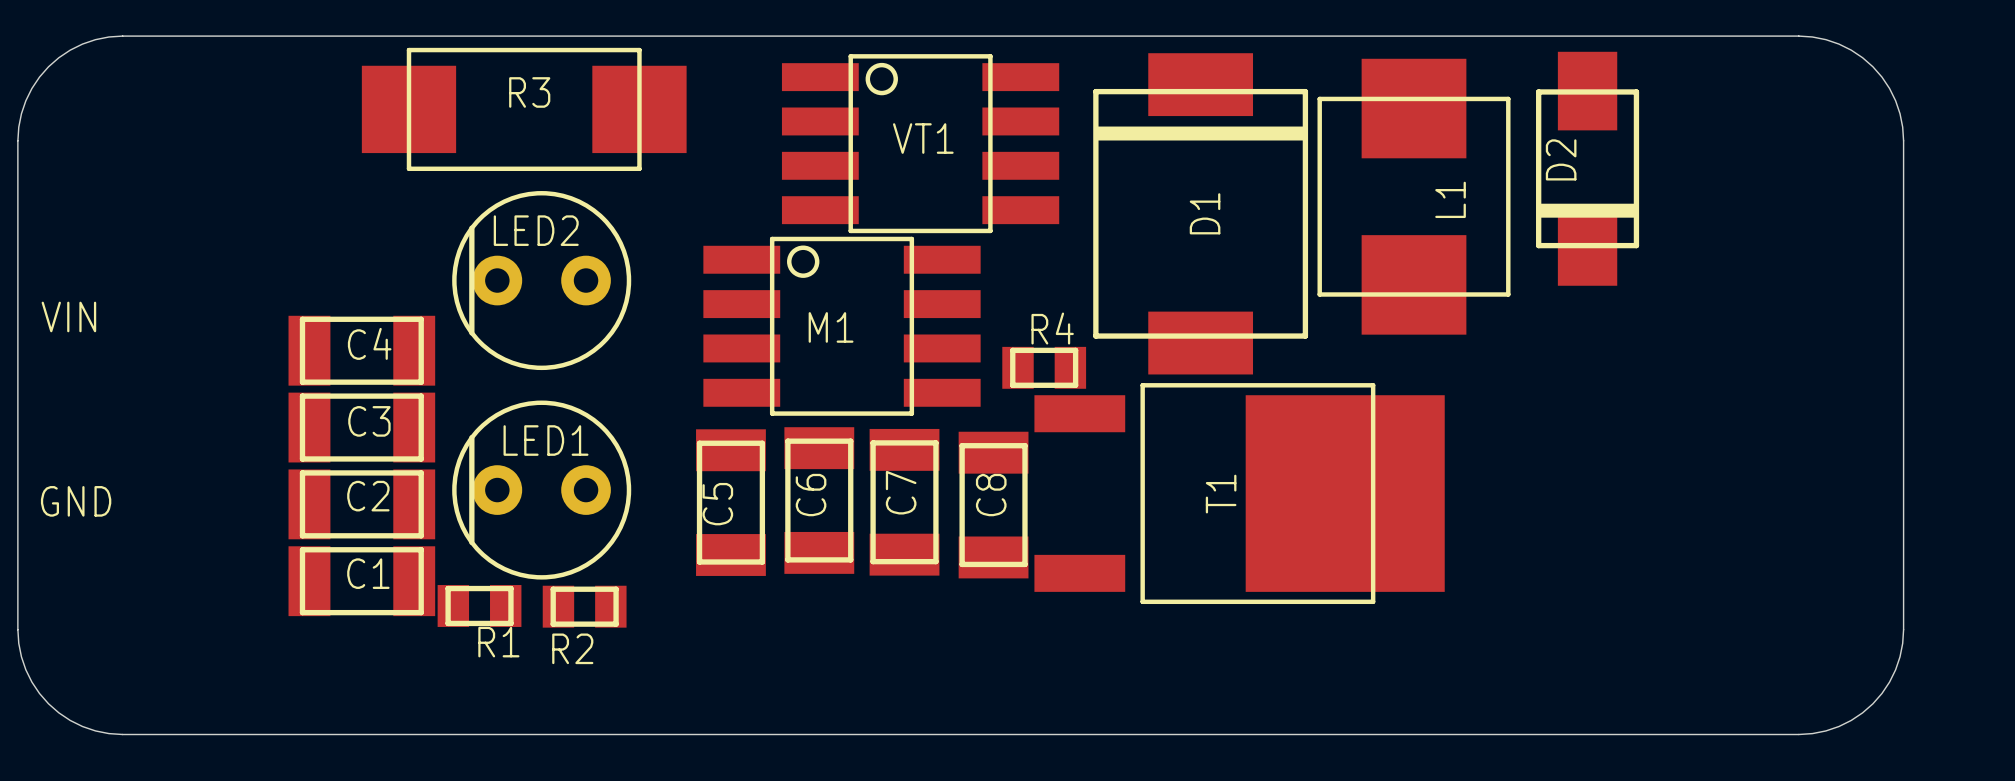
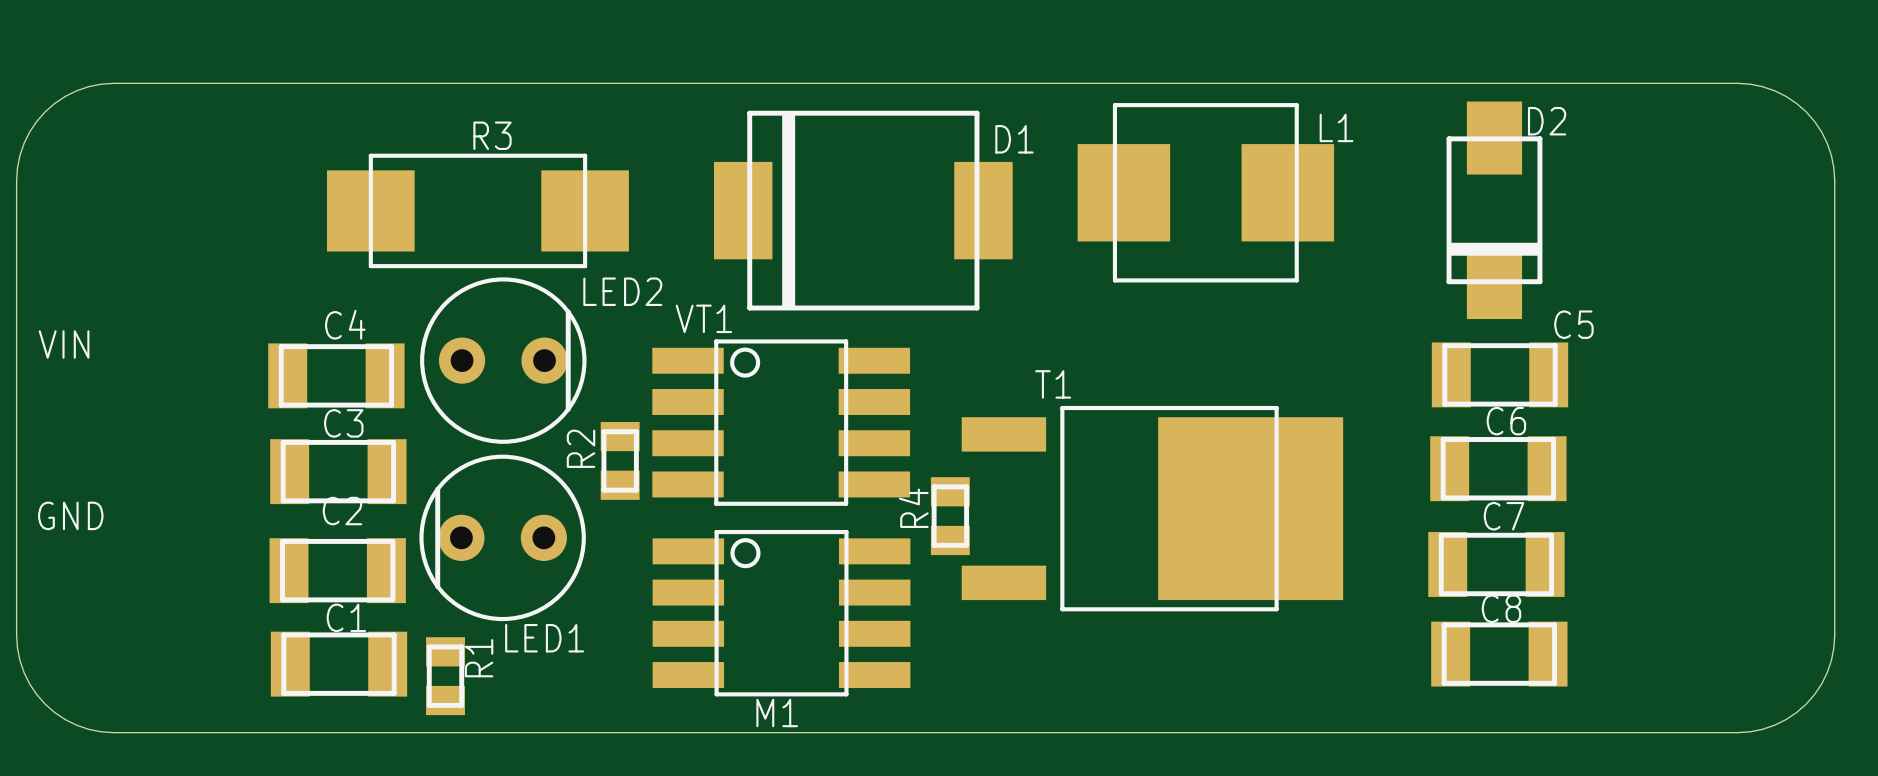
board edge: (1798, 36) (1825, 39) (1838, 44) (1862, 57) (1872, 66) (1881, 77) (1895, 100) (1900, 113) (1903, 140) (1902, 643) (1900, 656) (1889, 682) (1881, 693) (1862, 712) (1851, 720) (1825, 730) (1798, 734) -> (1672, 83) (1750, 84) (1762, 86) (1786, 96) (1806, 111) (1821, 132) (1831, 155) (1834, 180) (1834, 635) (1831, 660) (1821, 683) (1814, 694) (1796, 712) (1774, 725) (1750, 731) (1672, 732)
R3 position: (524, 109) -> (477, 210)
VT1 name position: VT1 (923, 138) -> VT1 (703, 318)
VT1 position: (920, 143) -> (781, 422)
D2 name rotation: 0° (1561, 159) -> 90° clockwise (1547, 121)
D2 name position: D2 (1561, 159) -> D2 (1547, 121)
D2 position: (1587, 168) -> (1494, 210)
L1 rotation: 0° (1414, 196) -> 90° clockwise (1205, 192)
L1 name position: L1 (1450, 199) -> L1 (1336, 127)
D1 rotation: 0° (1200, 213) -> 90° counterclockwise (863, 210)
D1 position: (1200, 213) -> (863, 210)
D1 name position: D1 (1205, 213) -> D1 (1014, 139)
LED2 name position: LED2 (536, 230) -> LED2 (622, 291)
LED2 rotation: 0° (541, 280) -> 180° (503, 360)
M1 position: (842, 326) -> (781, 613)
M1 name position: M1 (831, 327) -> M1 (777, 712)
C4 name position: C4 (369, 343) -> C4 (345, 324)
R4 rotation: 0° (1044, 367) -> 90° clockwise (950, 516)
R4 position: (1044, 367) -> (950, 516)
C3 name position: C3 (369, 421) -> C3 (343, 423)
C3 position: (361, 427) -> (338, 471)
LED1 name position: LED1 (546, 440) -> LED1 (544, 638)
LED1 position: (541, 490) -> (502, 537)
T1 name rotation: 0° (1221, 494) -> 90° clockwise (1053, 384)
T1 name position: T1 (1221, 494) -> T1 (1053, 384)
C6 rotation: 0° (819, 500) -> 90° clockwise (1498, 468)
C6 position: (819, 500) -> (1498, 468)
C5 rotation: 0° (730, 502) -> 90° clockwise (1499, 374)
C5 position: (730, 502) -> (1499, 374)
C7 rotation: 0° (904, 502) -> 90° clockwise (1496, 564)
C7 position: (904, 502) -> (1496, 564)
C2 position: (361, 504) -> (337, 570)
C5 name position: C5 (717, 504) -> C5 (1573, 324)
C8 rotation: 0° (993, 505) -> 90° clockwise (1499, 654)
C8 position: (993, 505) -> (1499, 654)
C1 name position: C1 (368, 573) -> C1 (346, 617)
C1 position: (361, 581) -> (339, 664)
R1 rotation: 0° (479, 605) -> 90° clockwise (445, 676)
R1 position: (479, 605) -> (445, 676)
R2 rotation: 0° (584, 606) -> 90° clockwise (620, 460)
R2 position: (584, 606) -> (620, 460)

